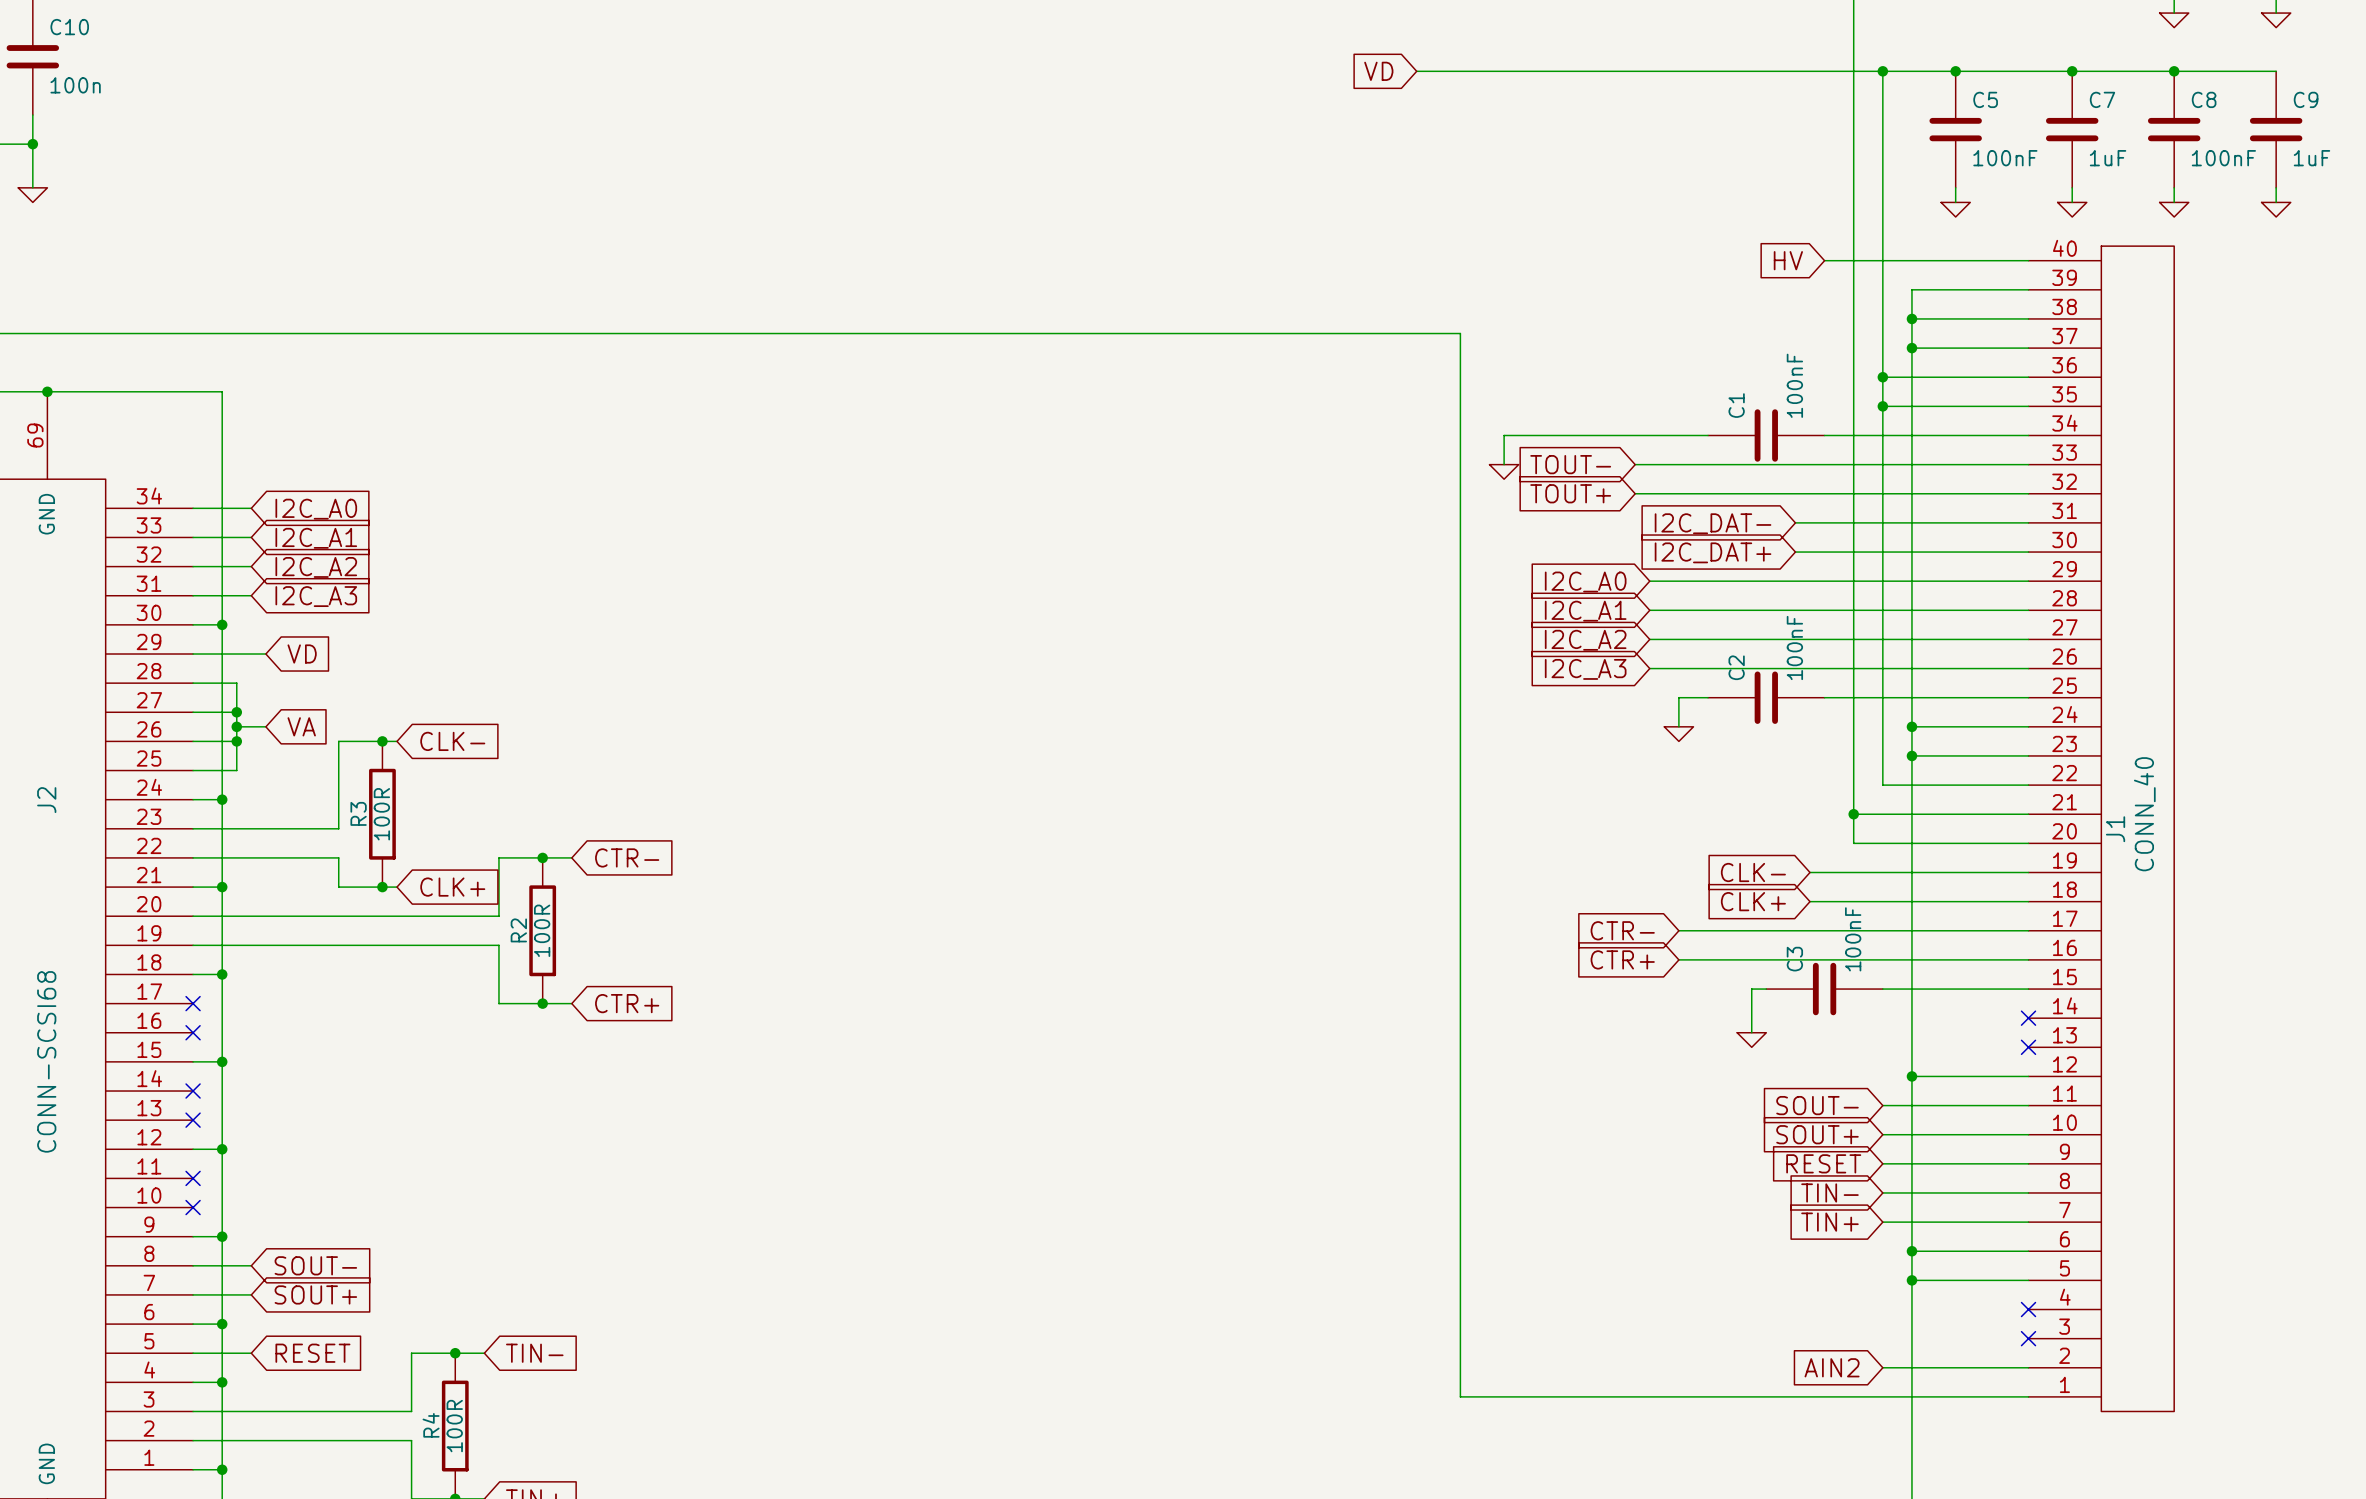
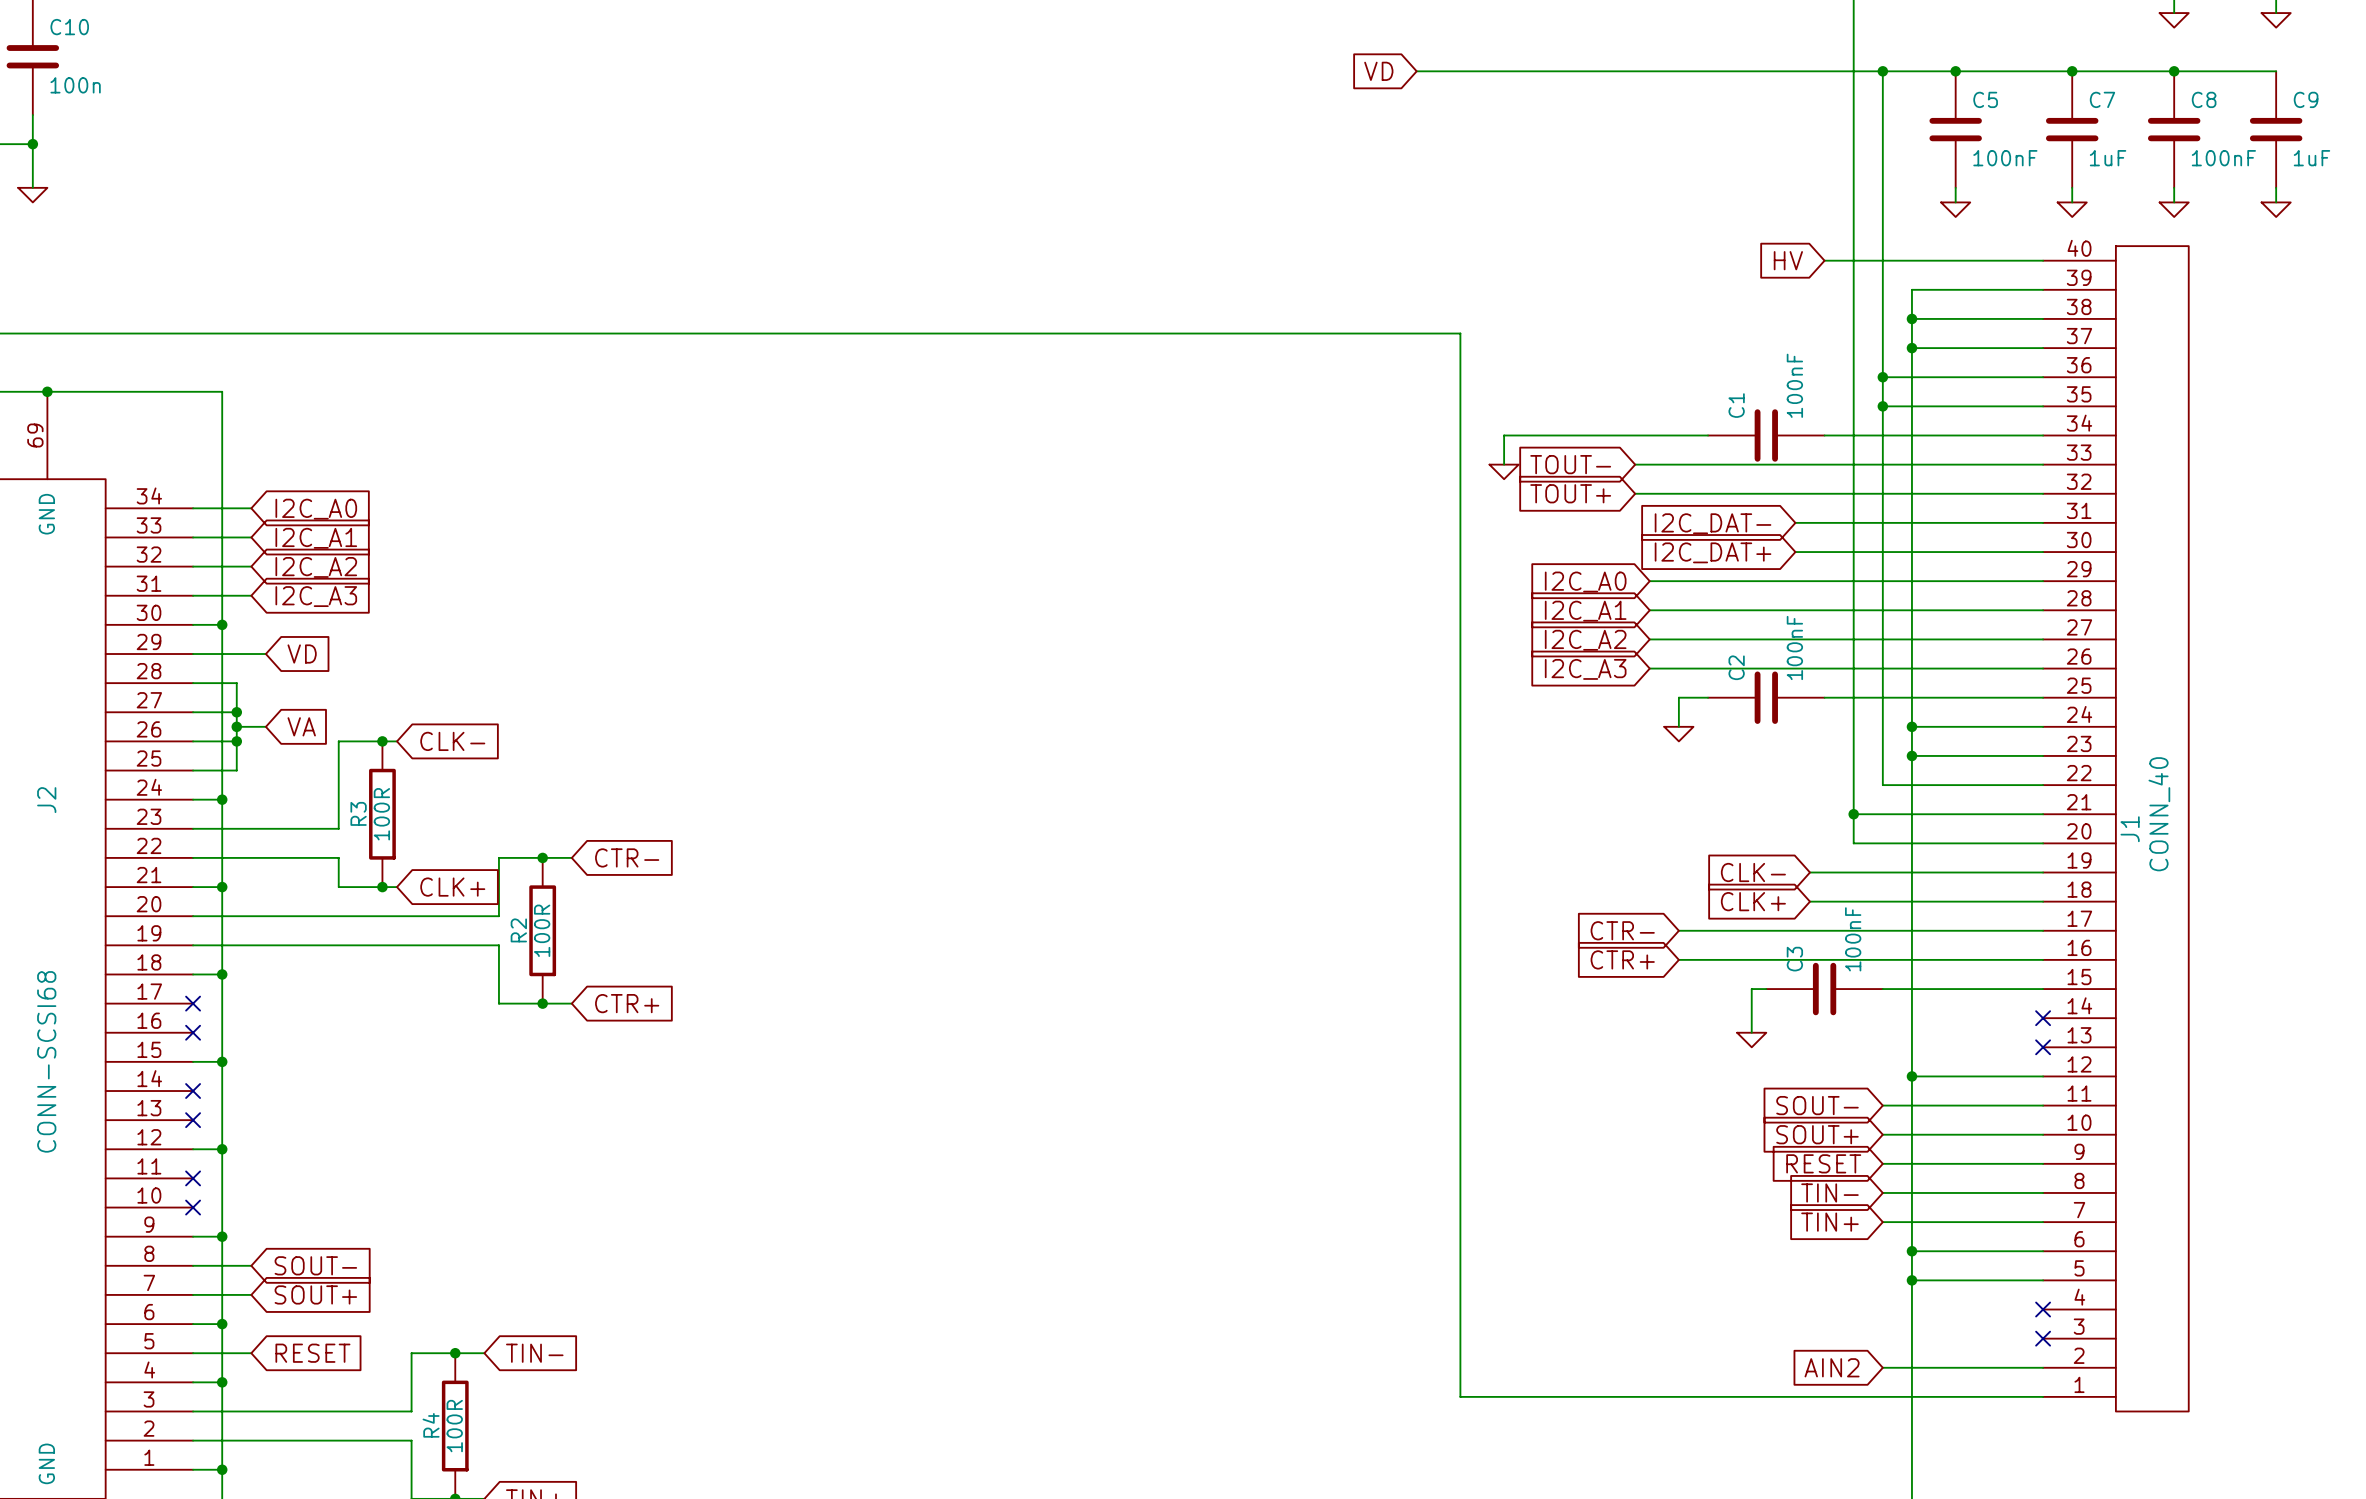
J1 position: (2101, 828) -> (2115, 828)
no-connect mark position: (2028, 1018) -> (2043, 1018)
no-connect mark position: (2028, 1047) -> (2043, 1047)
no-connect mark position: (2028, 1309) -> (2043, 1309)
no-connect mark position: (2028, 1338) -> (2043, 1338)

